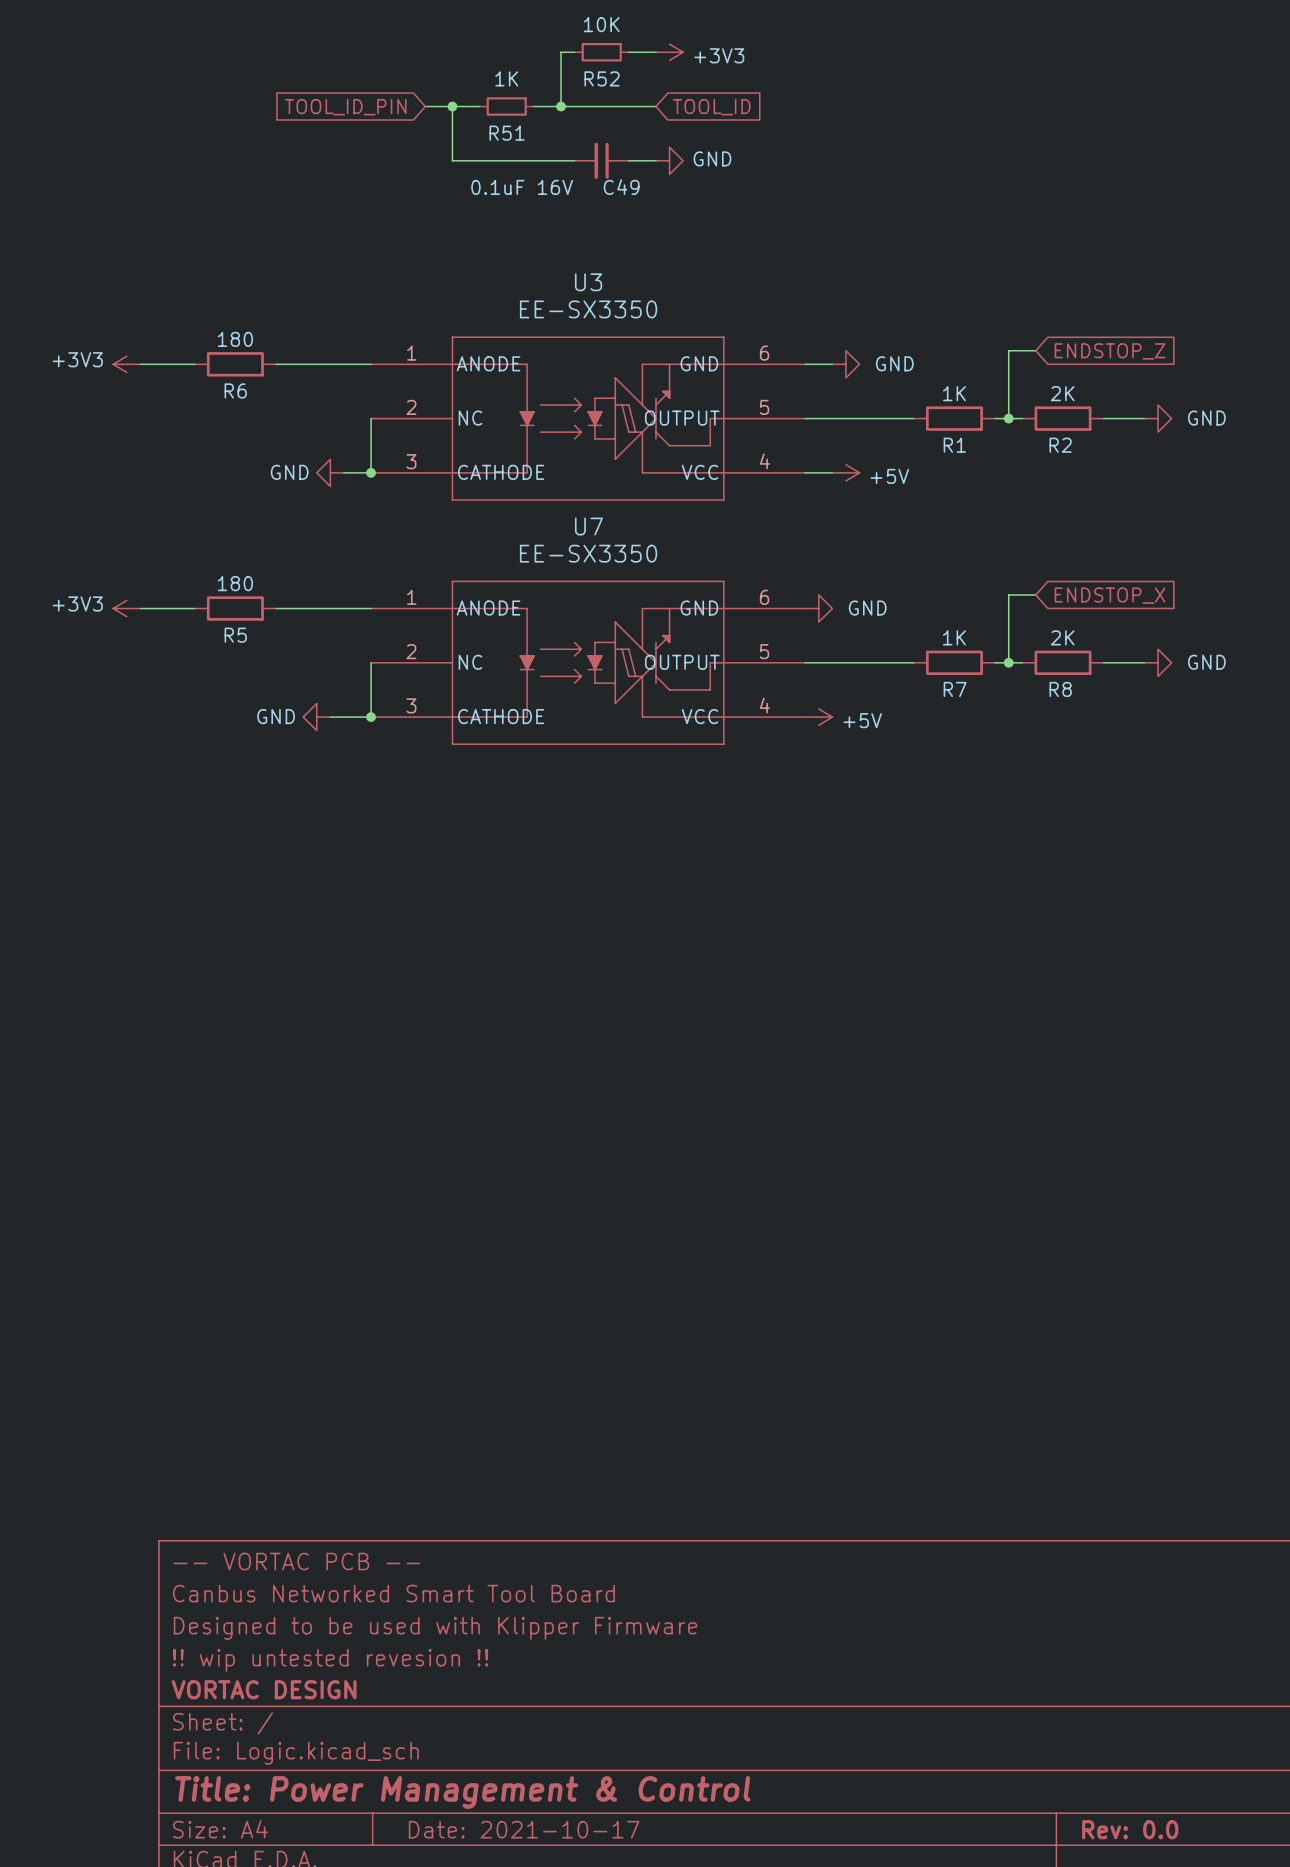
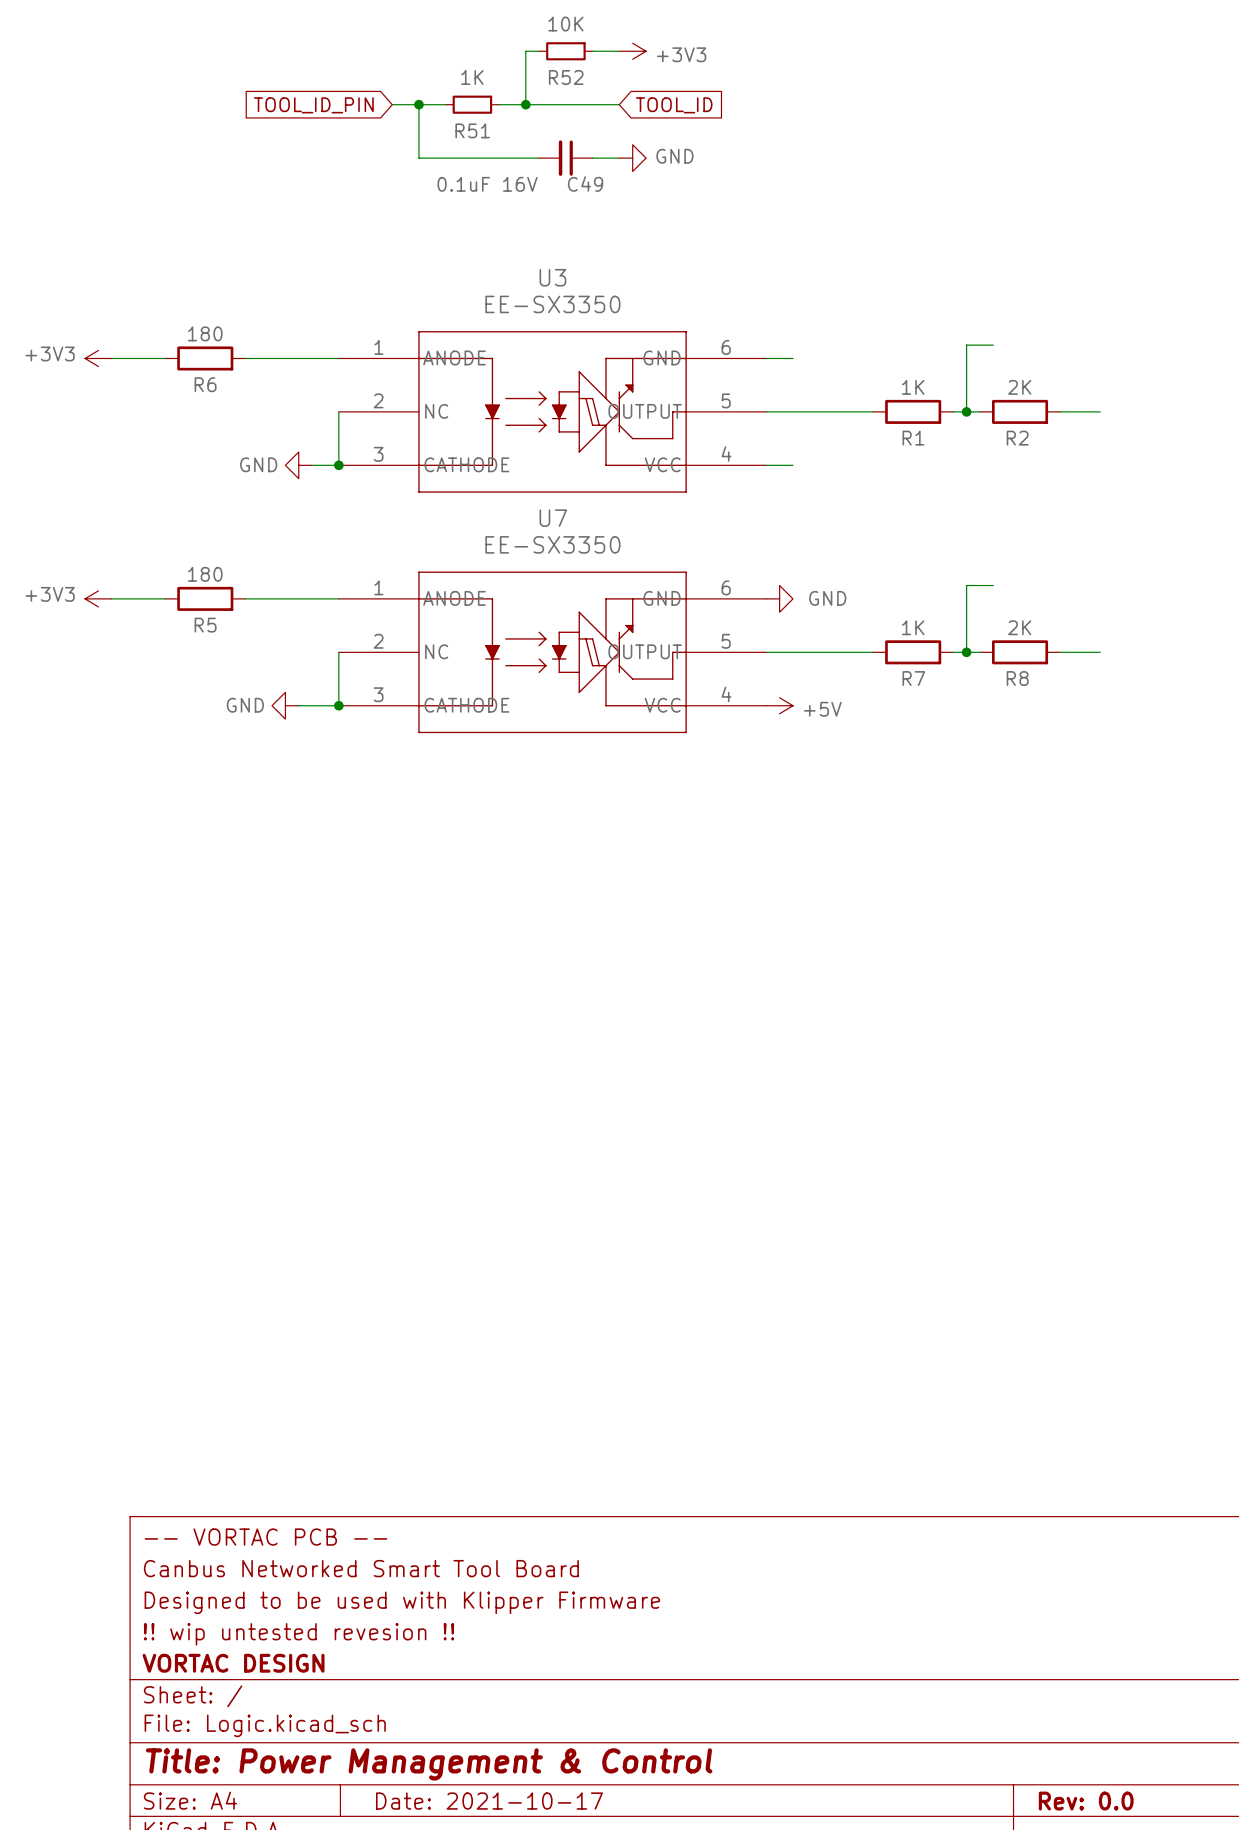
global label: ENDSTOP_Z (1110, 351) -> none
power symbol: GND (845, 364) -> none
power symbol: GND (1158, 418) -> none
power symbol: +5V (845, 472) -> none
global label: ENDSTOP_X (1110, 595) -> none
power symbol: GND (1158, 662) -> none

